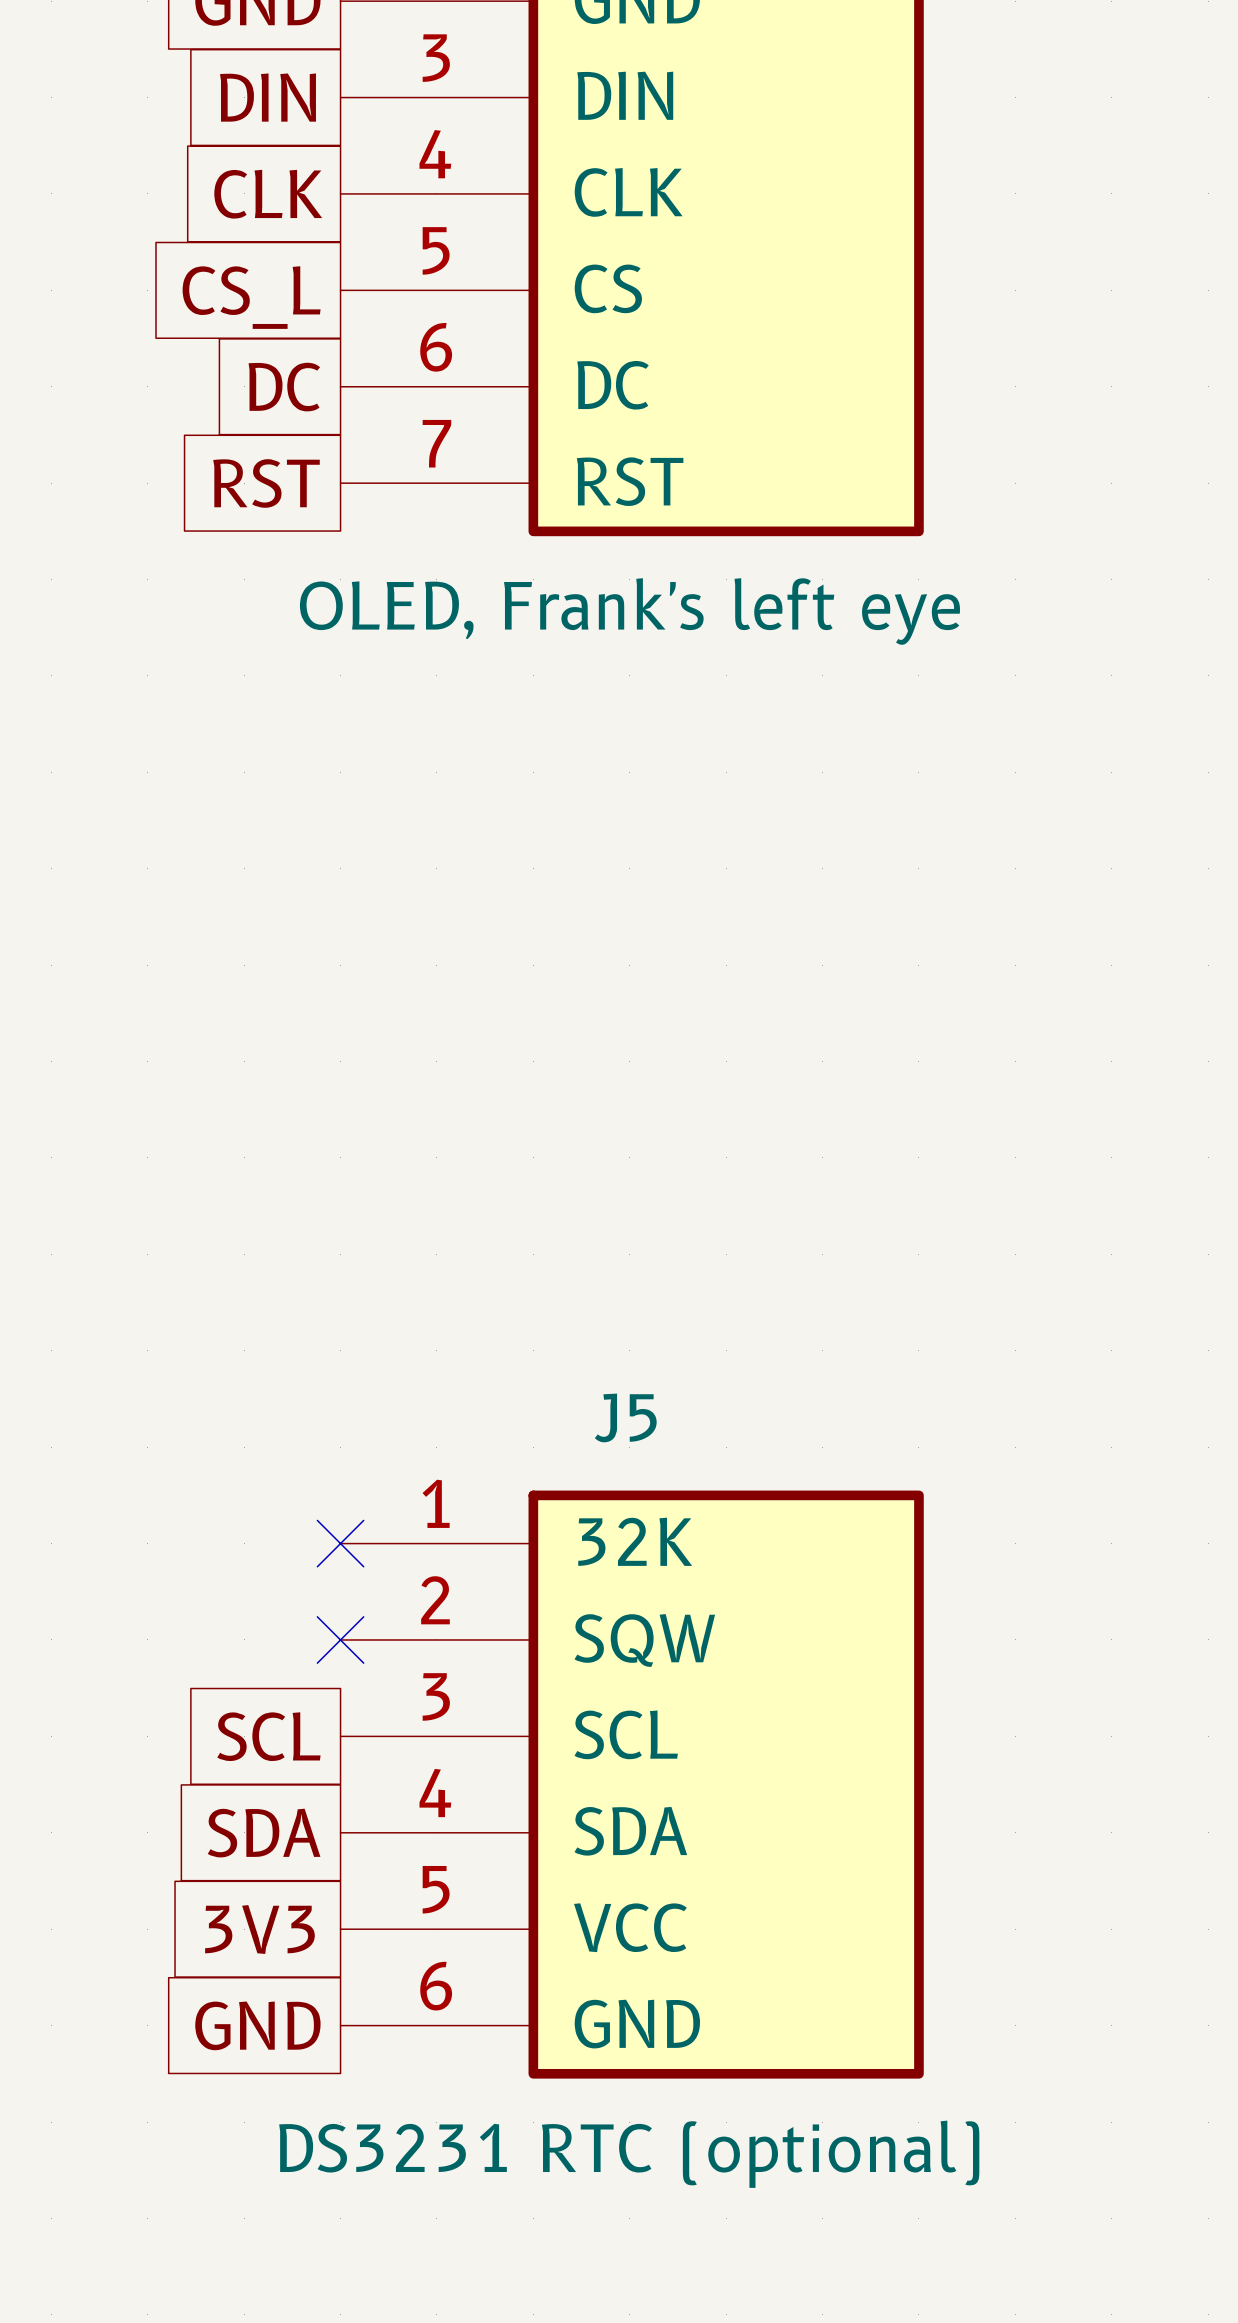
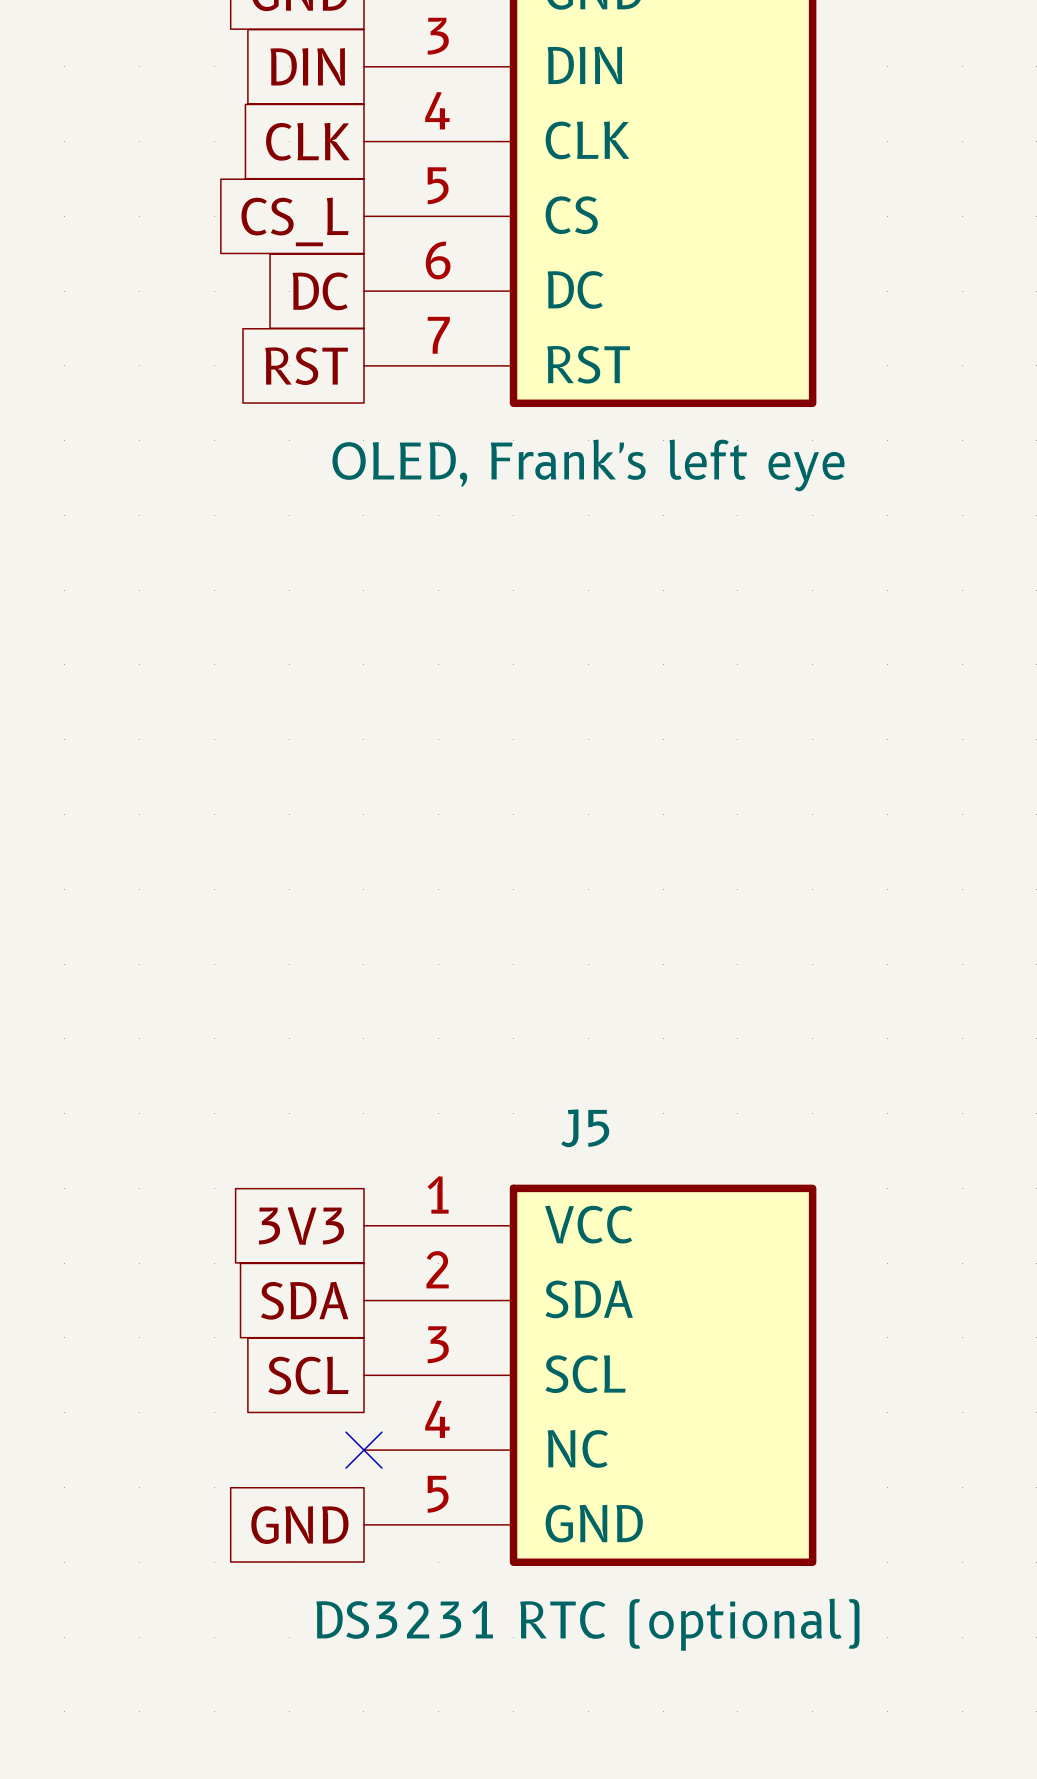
J5 symbol: [340, 1490, 924, 2079] -> [363, 1184, 817, 1567]
no-connect mark: (340, 1543) -> none
no-connect mark: (340, 1639) -> none
global label position: SCL (268, 1736) -> SCL (308, 1375)
global label position: SDA (264, 1833) -> SDA (304, 1300)
no-connect mark: none -> (363, 1450)
global label position: 3V3 (259, 1929) -> 3V3 (301, 1226)
global label position: GND (257, 2025) -> GND (299, 1525)

